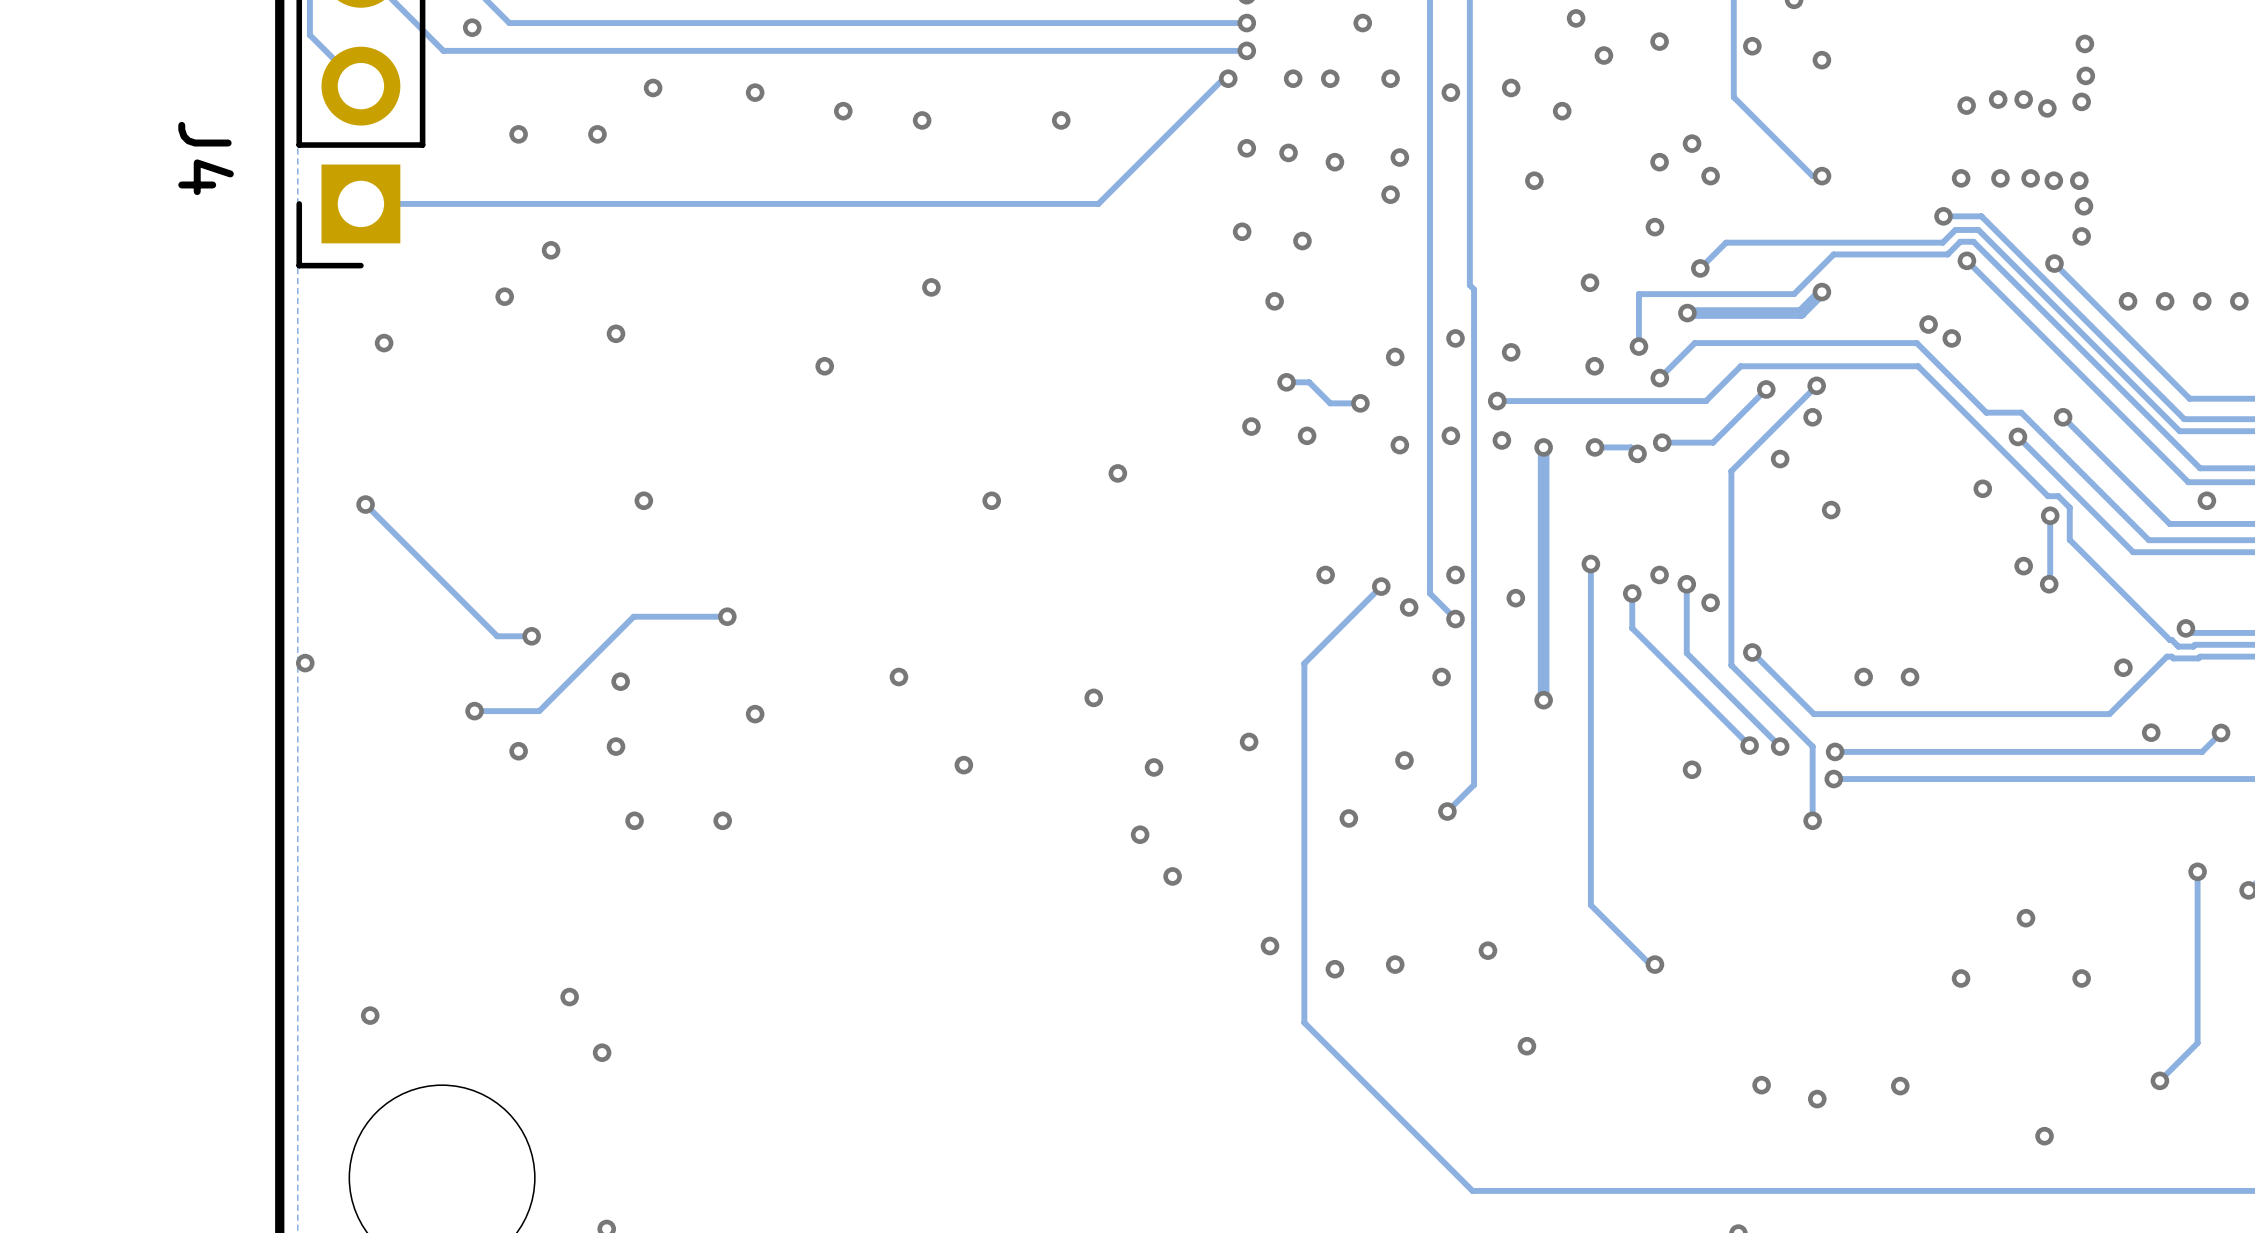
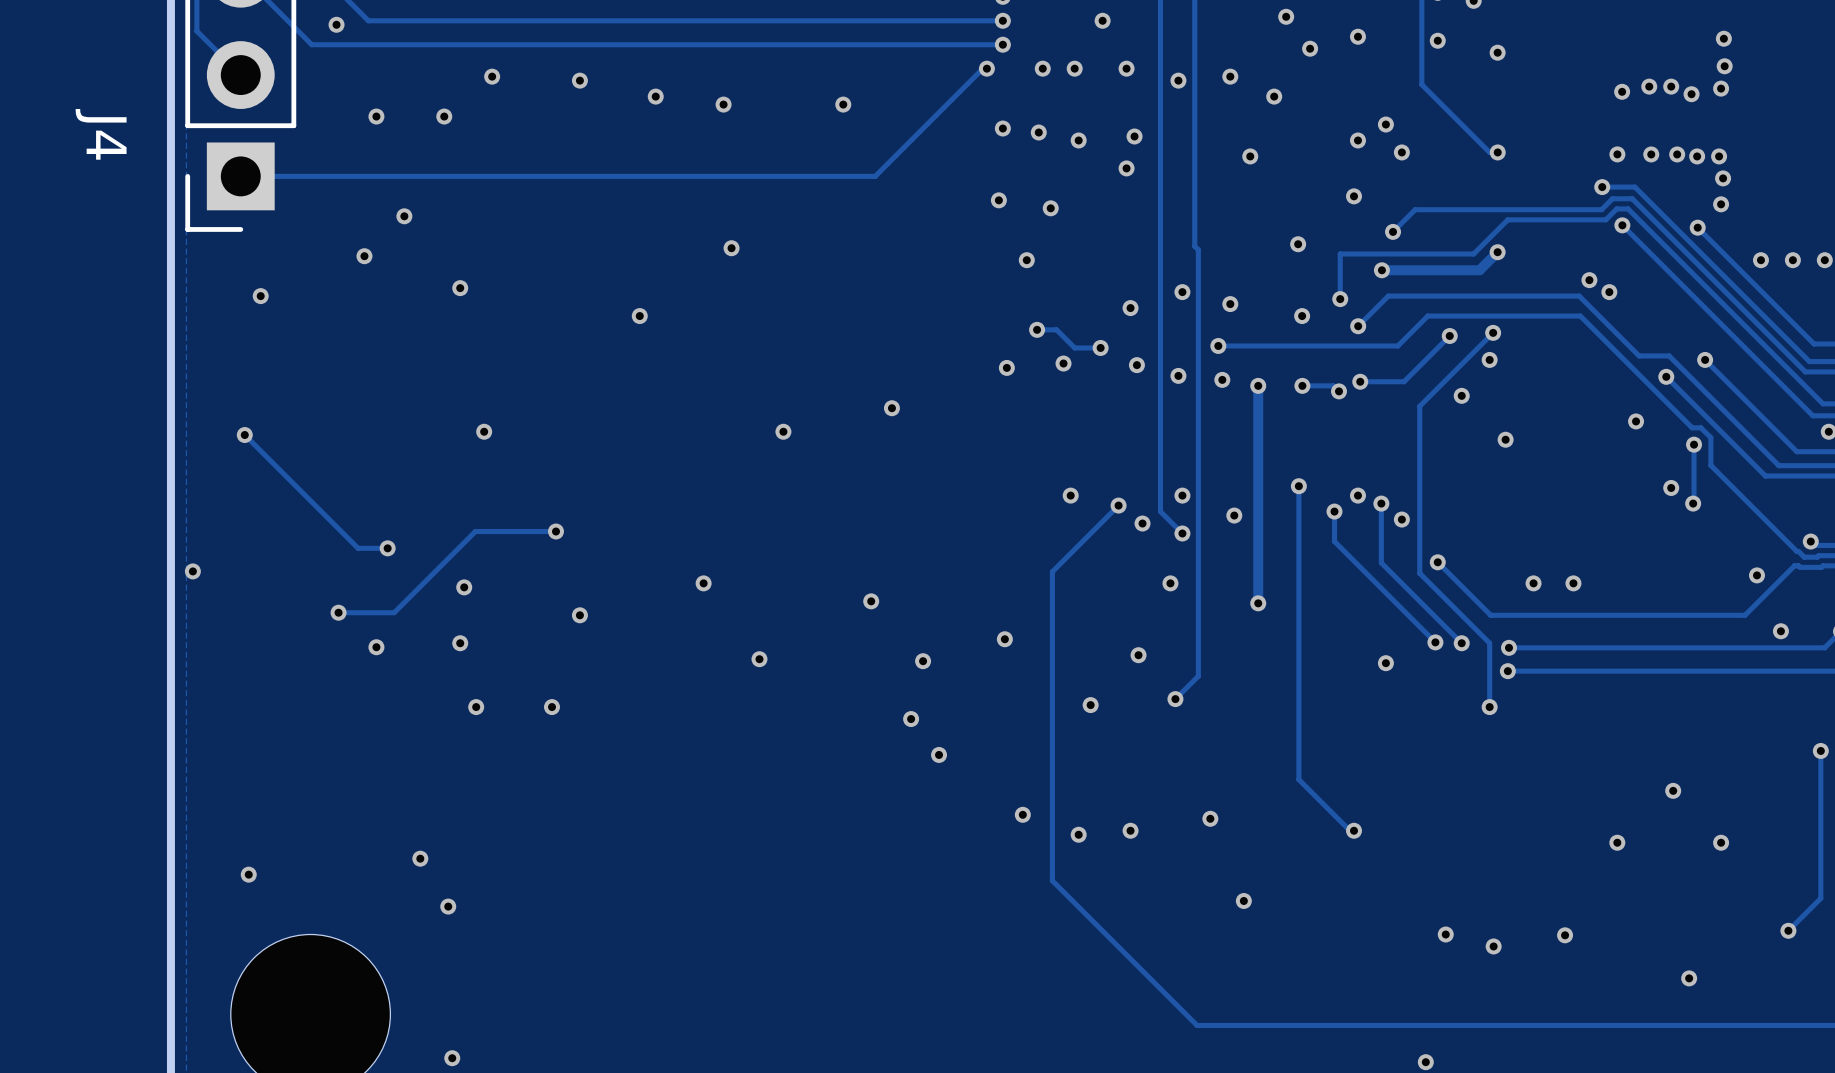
via position: (1307, 435) -> (1063, 363)
via position: (1399, 445) -> (1136, 365)

